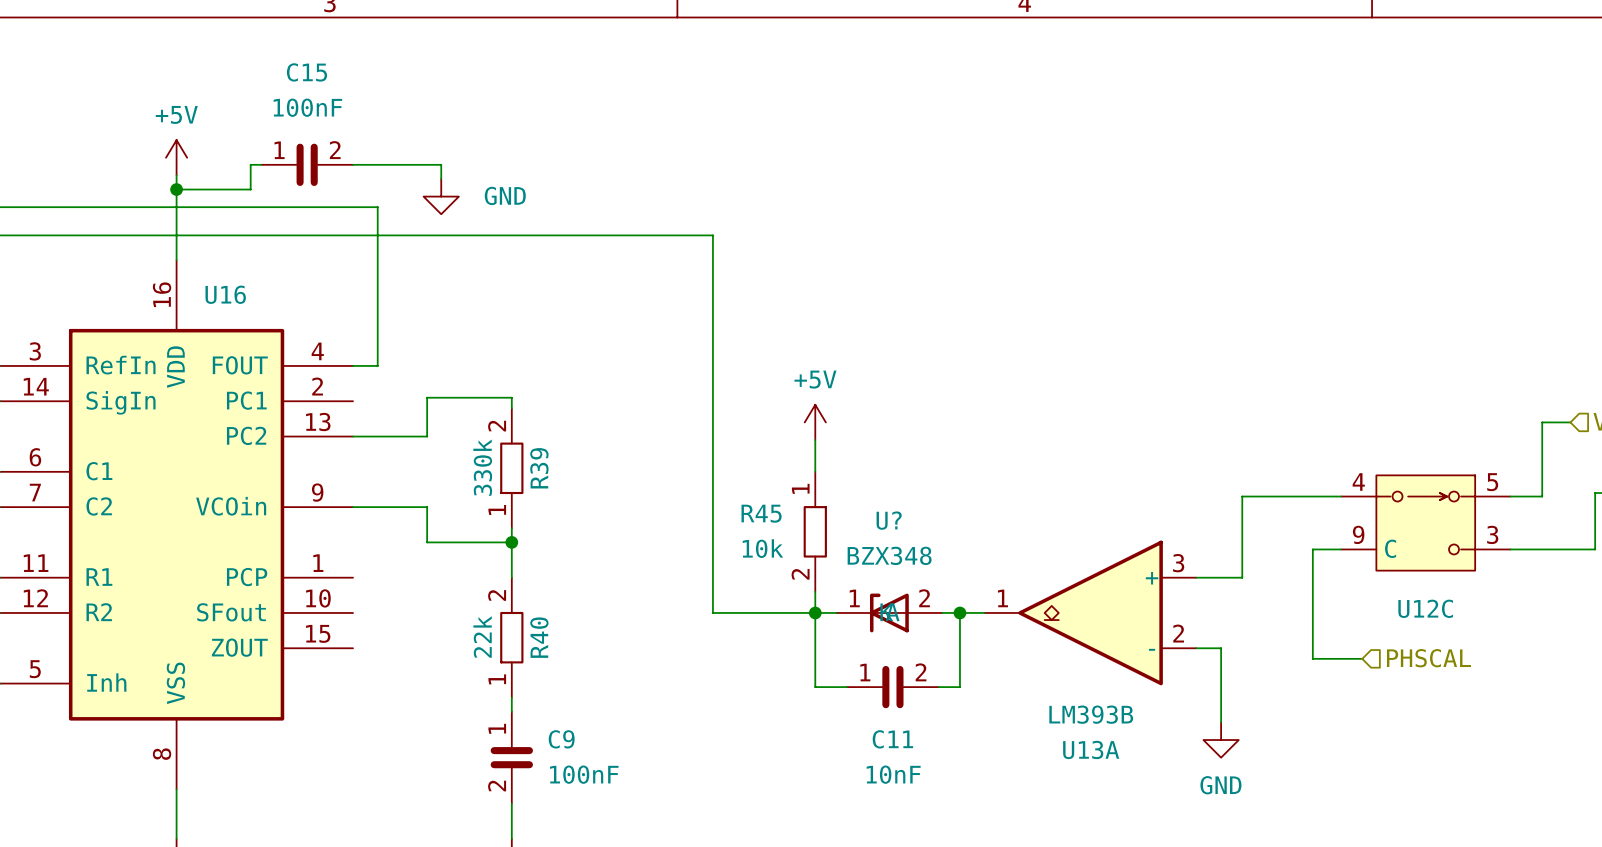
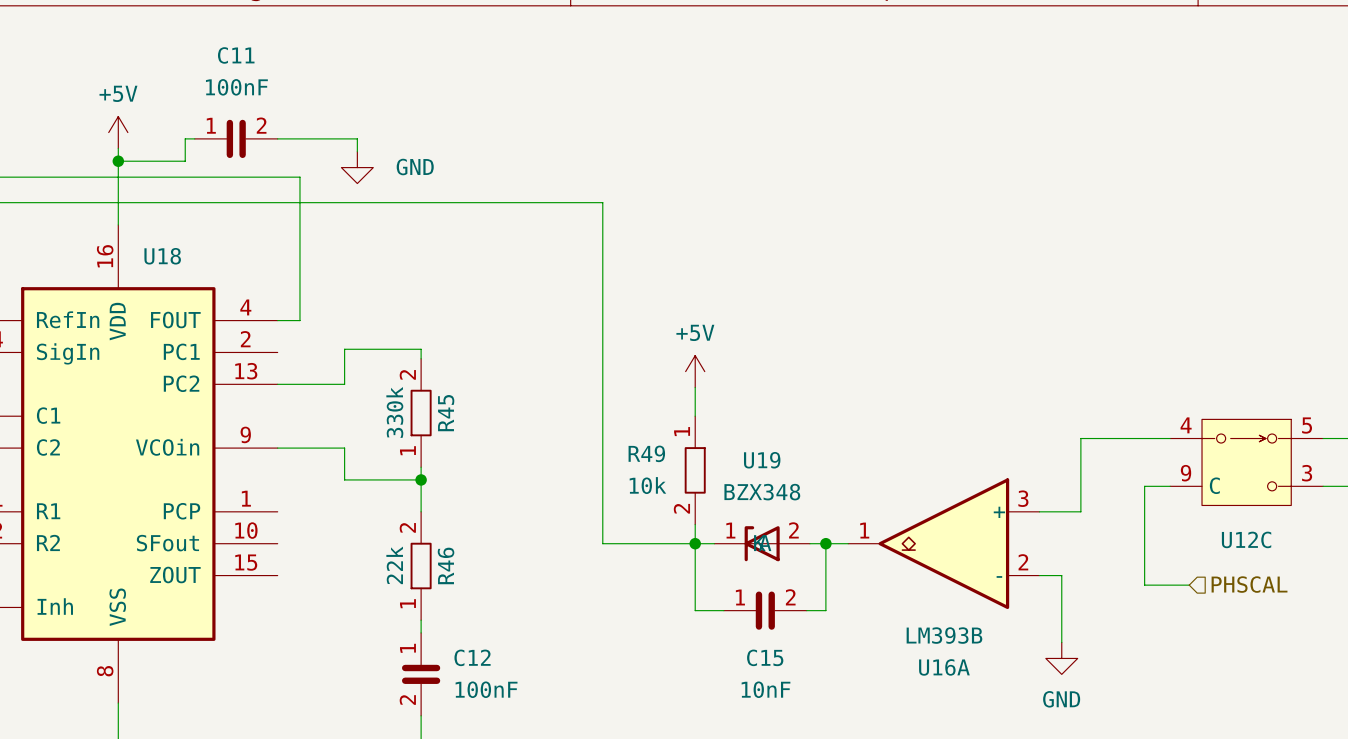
C15 name: C15 (307, 72) -> C11 (236, 55)
U16 name: U16 (225, 294) -> U18 (162, 256)
R39 name: R39 (539, 468) -> R45 (446, 413)
R45 name: R45 (761, 513) -> R49 (646, 453)
U? name: U? (889, 520) -> U19 (762, 460)
R40 name: R40 (539, 637) -> R46 (446, 565)
C9 name: C9 (561, 739) -> C12 (472, 657)
C11 name: C11 (892, 739) -> C15 (765, 657)
U13A name: U13A (1091, 749) -> U16A (944, 667)

